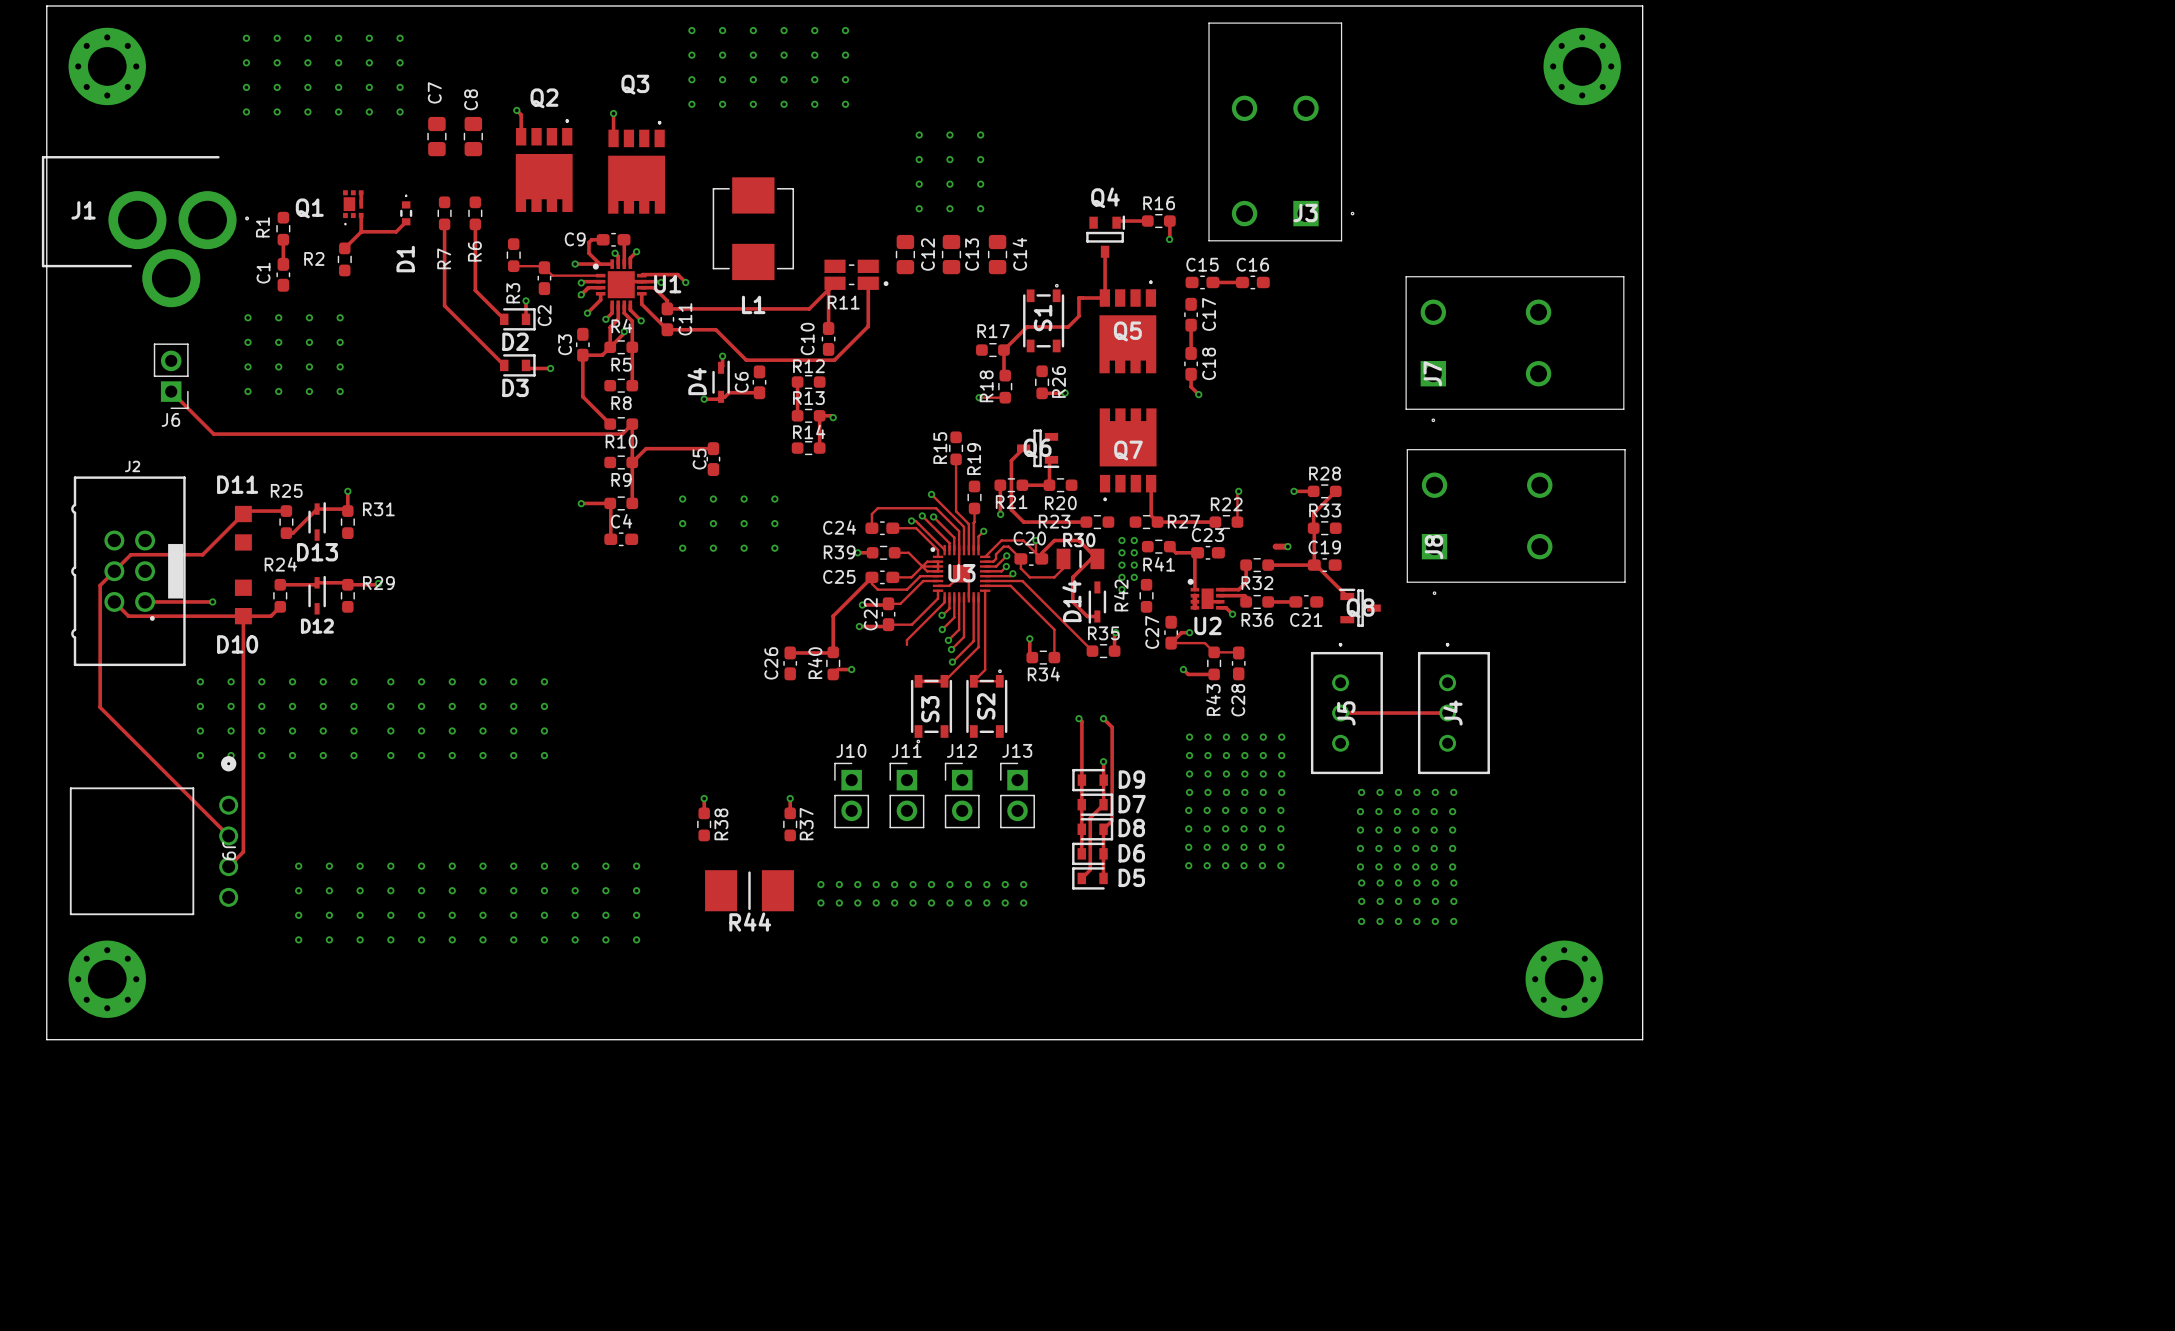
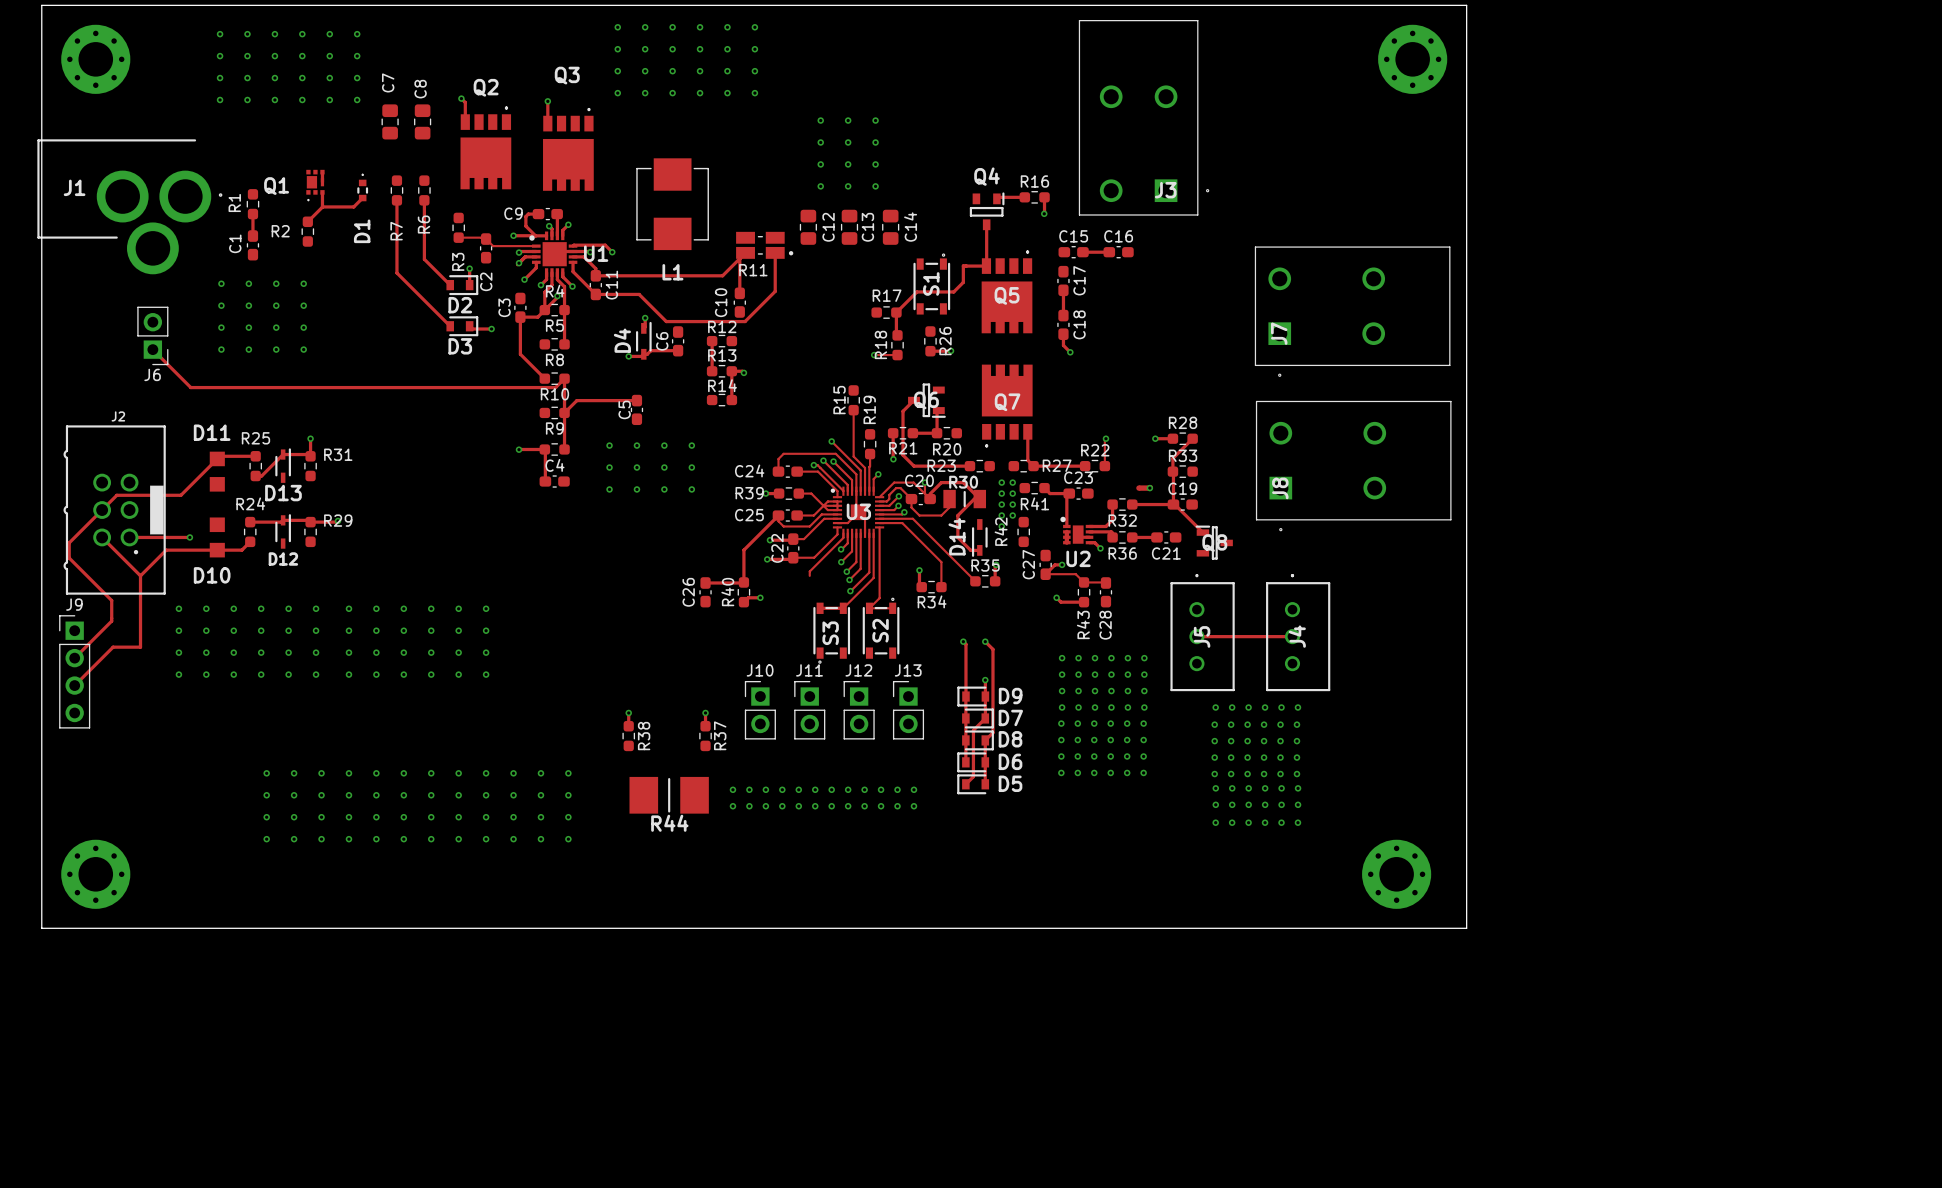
track: (100, 585) (100, 707) (228, 835) -> (89, 522) (69, 542) (69, 558) (111, 600) (111, 621) (74, 658)
track: (128, 616) (186, 616) -> (114, 550) (140, 575)
track: none -> (166, 550) (140, 575)
track: (243, 616) (243, 851) (228, 866) -> none
track: none -> (140, 575) (140, 647) (113, 647) (74, 685)
J9 footprint: [69, 756, 239, 916] -> [59, 615, 91, 729]
J9 name position: J9 (229, 851) -> J9 (74, 604)

